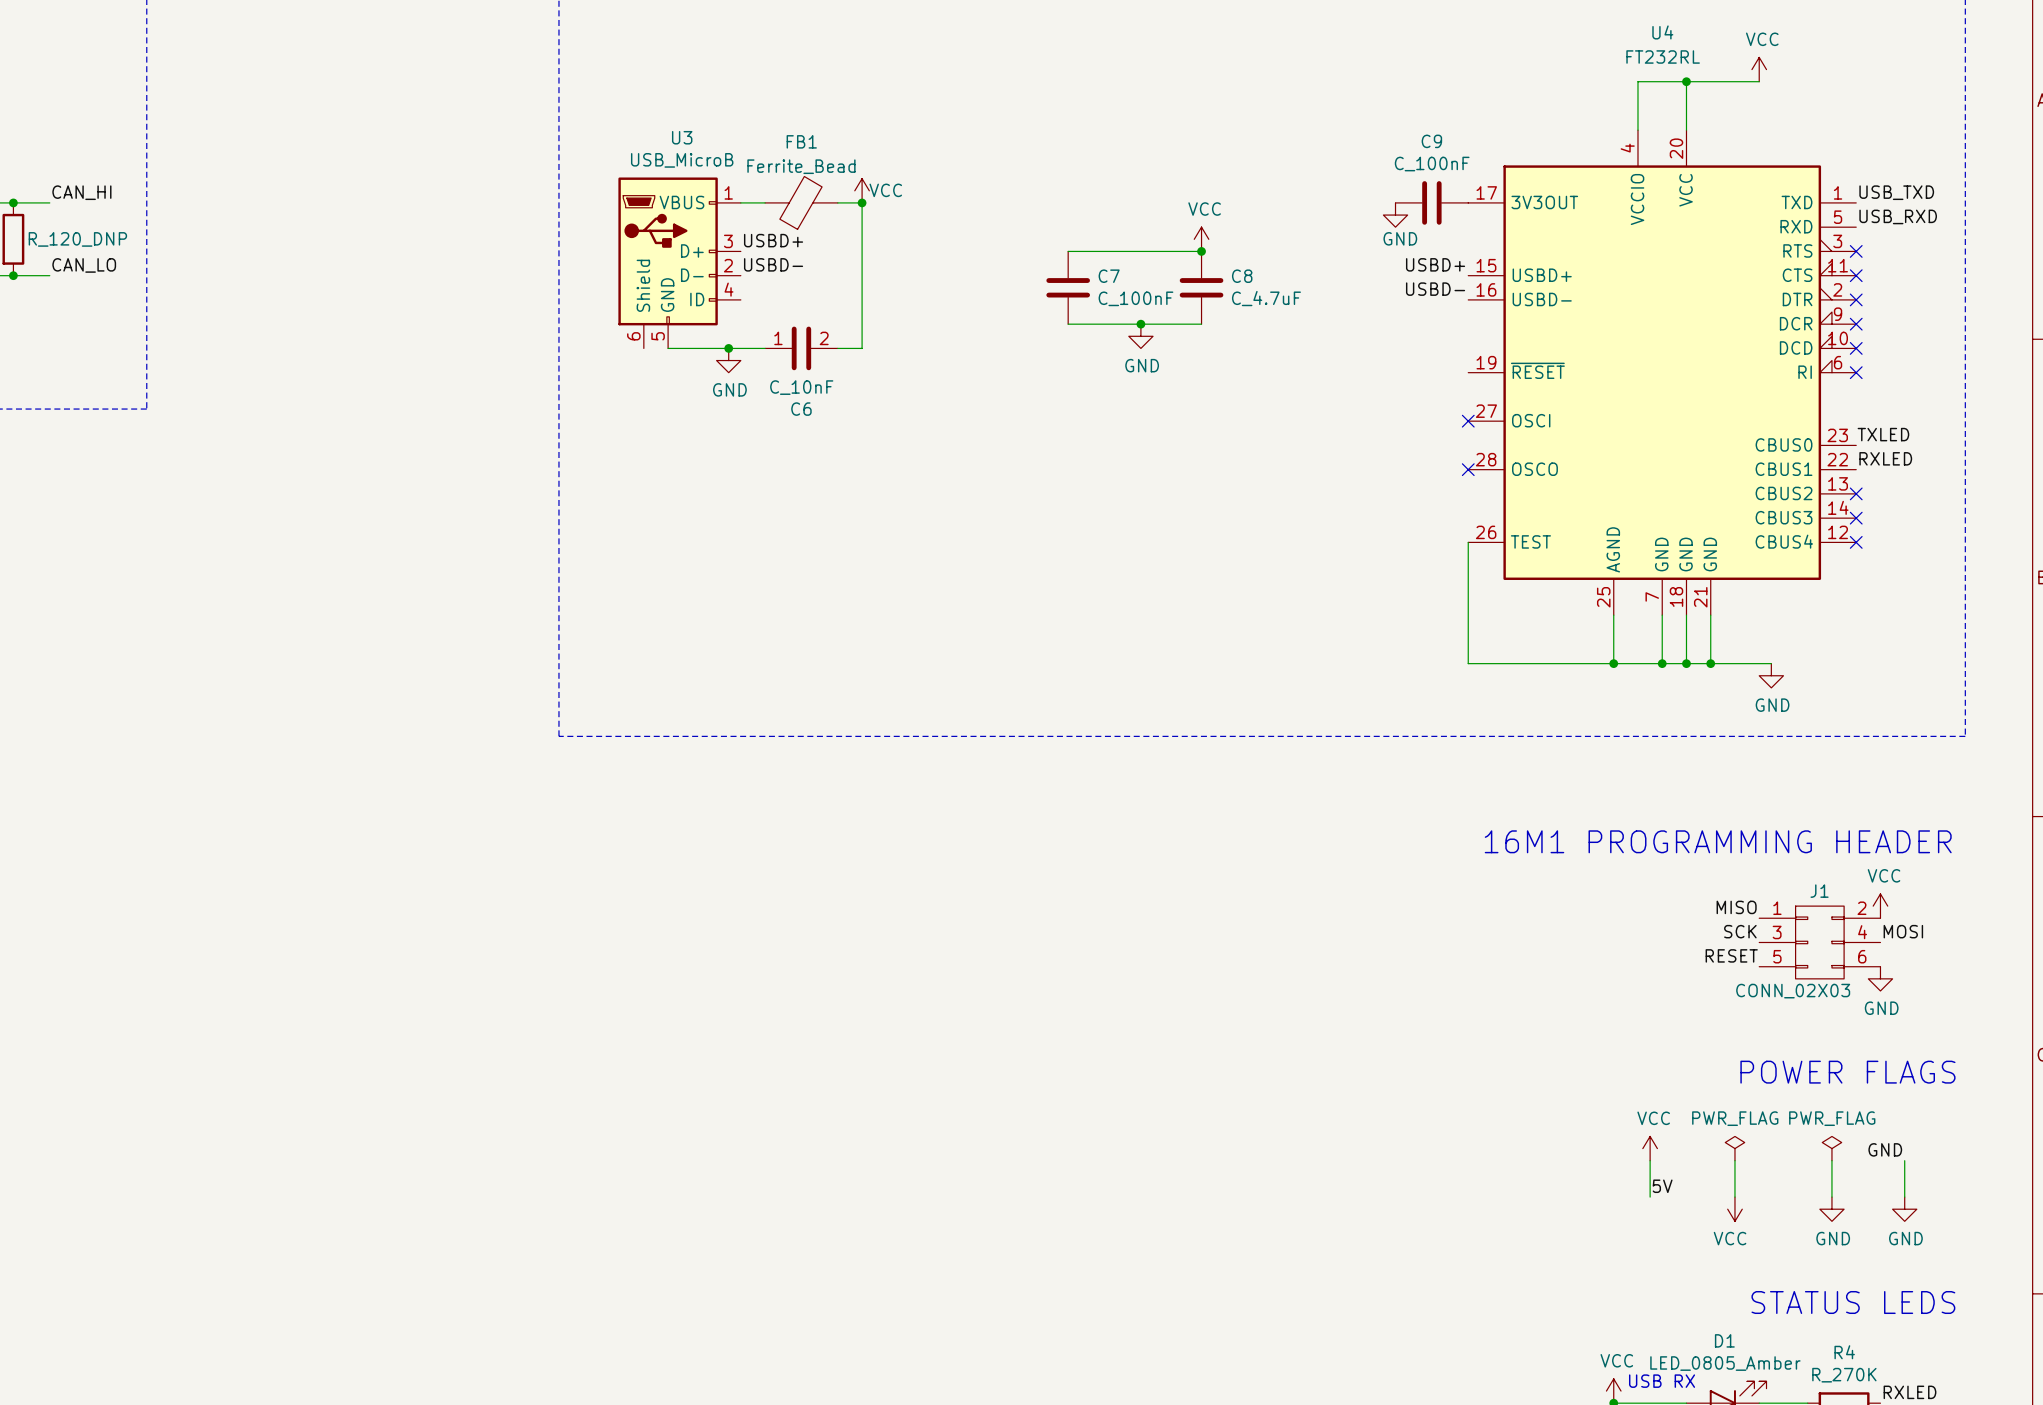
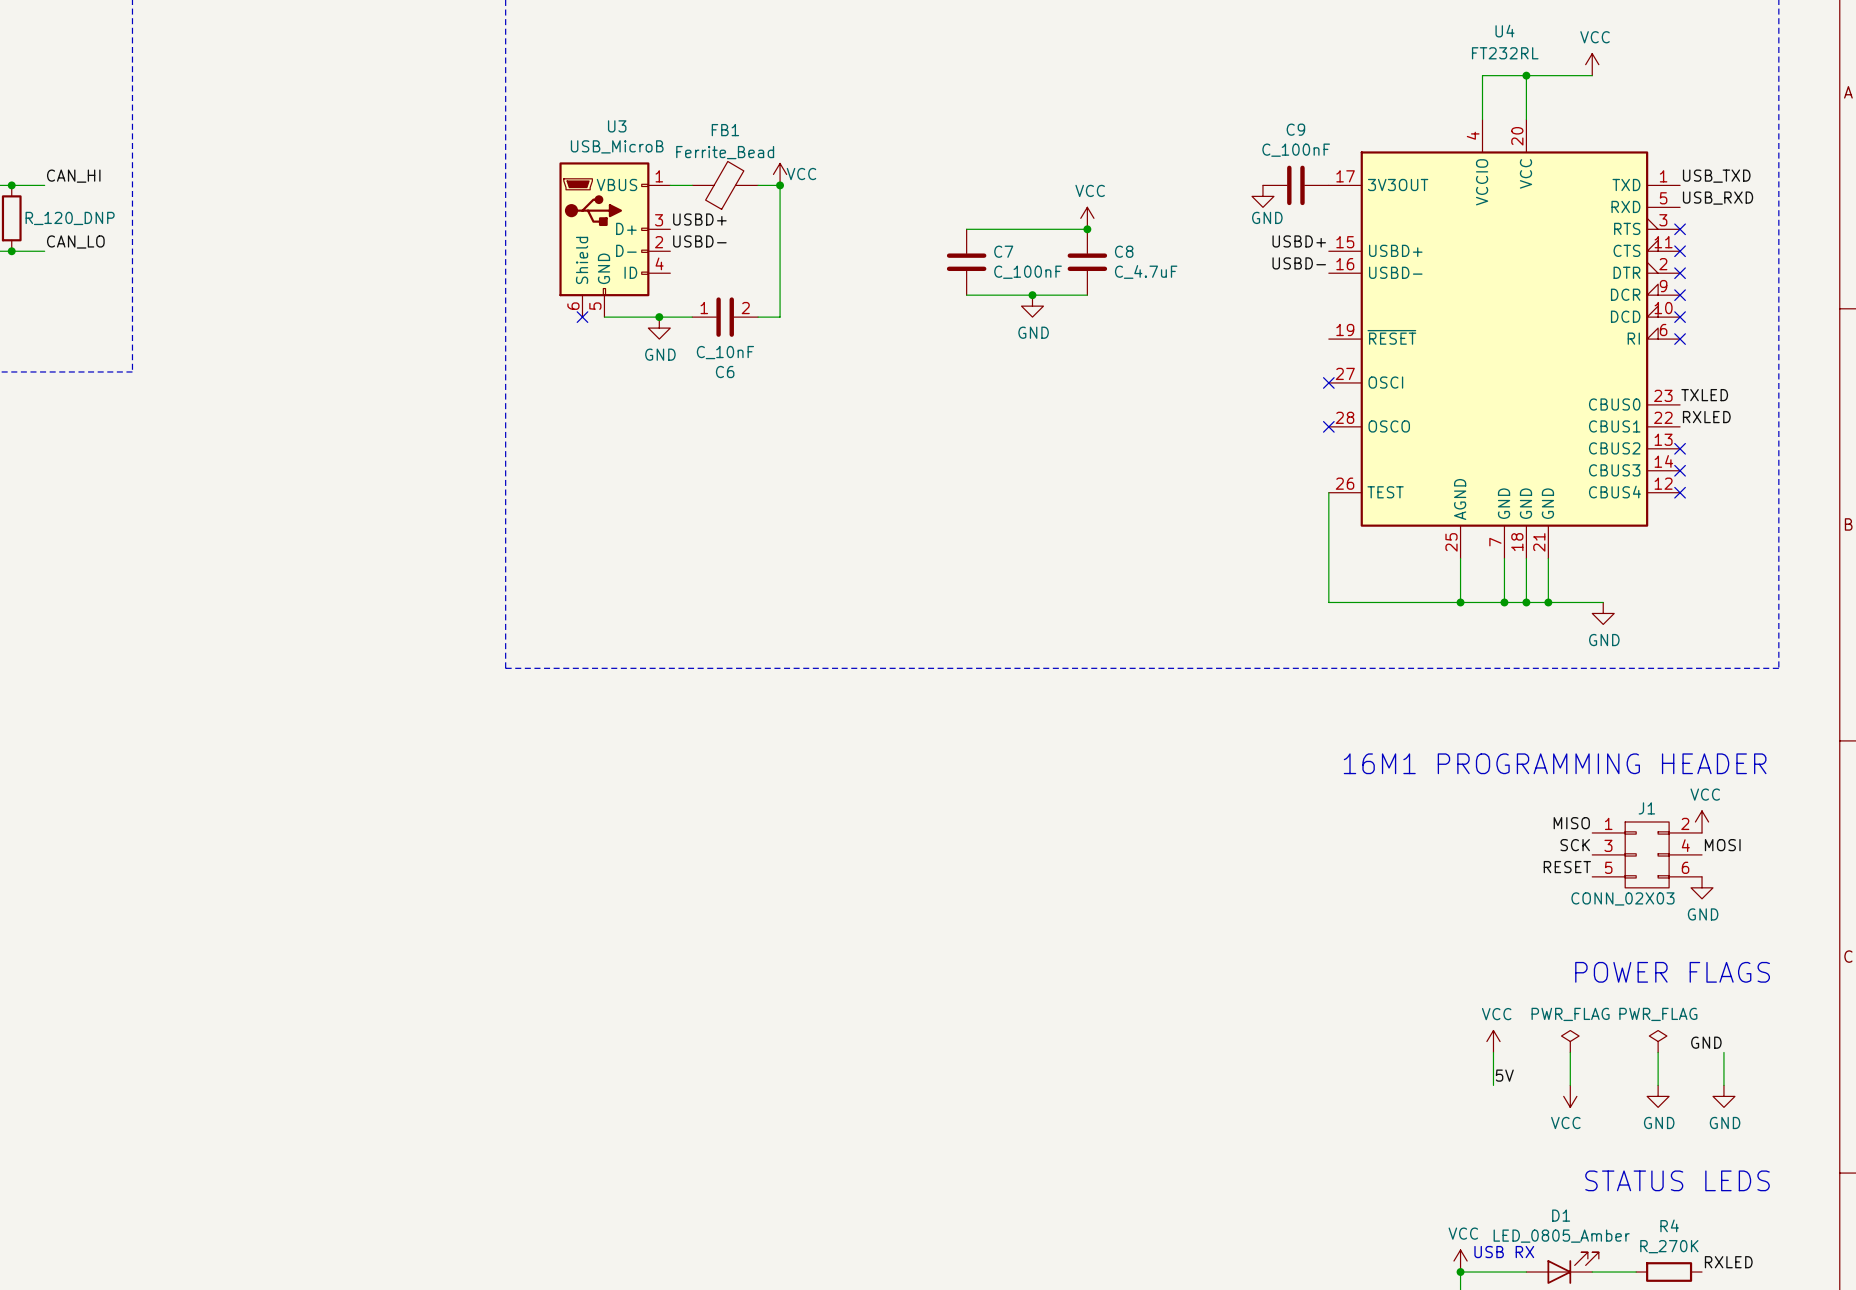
no-connect mark: none -> (582, 317)

